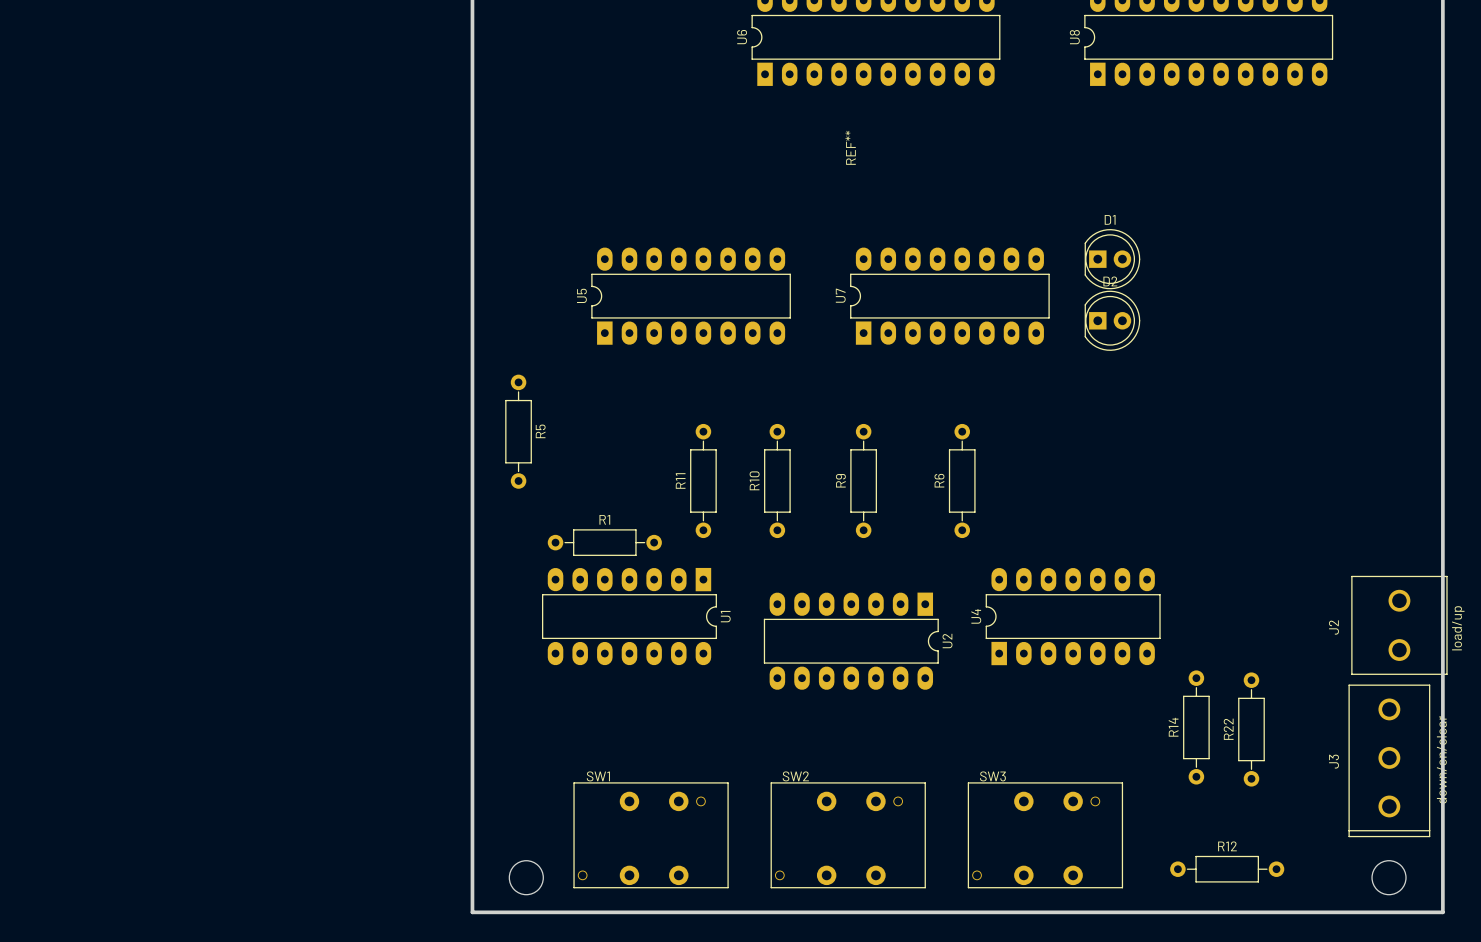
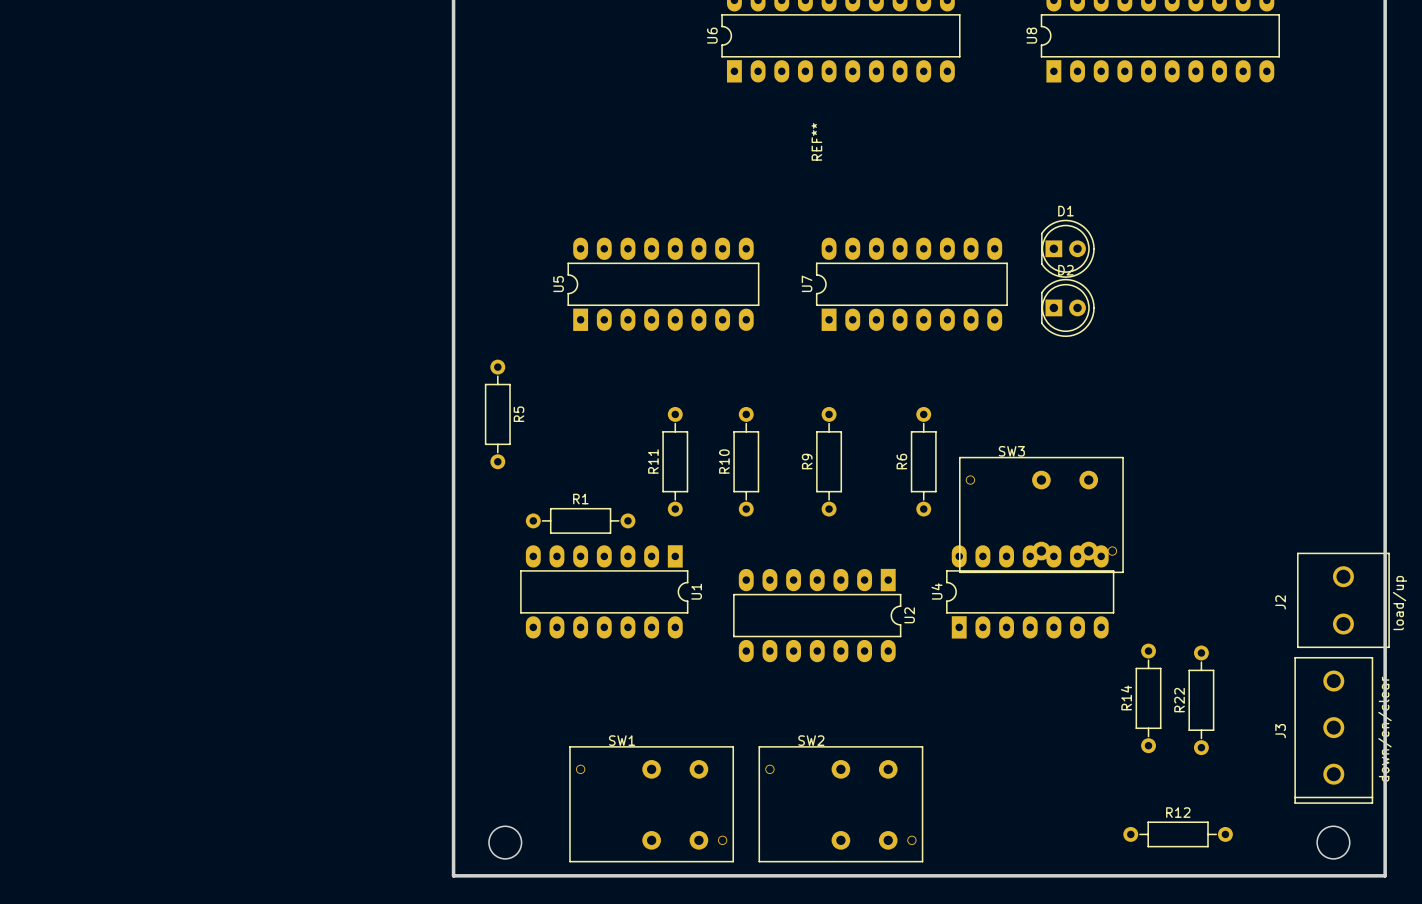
SW1 name position: SW1 (598, 776) -> SW1 (622, 740)
SW2 name position: SW2 (795, 776) -> SW2 (811, 740)
SW3 name position: SW3 (992, 776) -> SW3 (1011, 451)
SW1 footprint: [573, 782, 729, 889] -> [569, 746, 734, 863]
SW2 footprint: [770, 782, 926, 889] -> [758, 746, 924, 863]
SW3 footprint: [967, 782, 1124, 889] -> [959, 457, 1124, 573]

